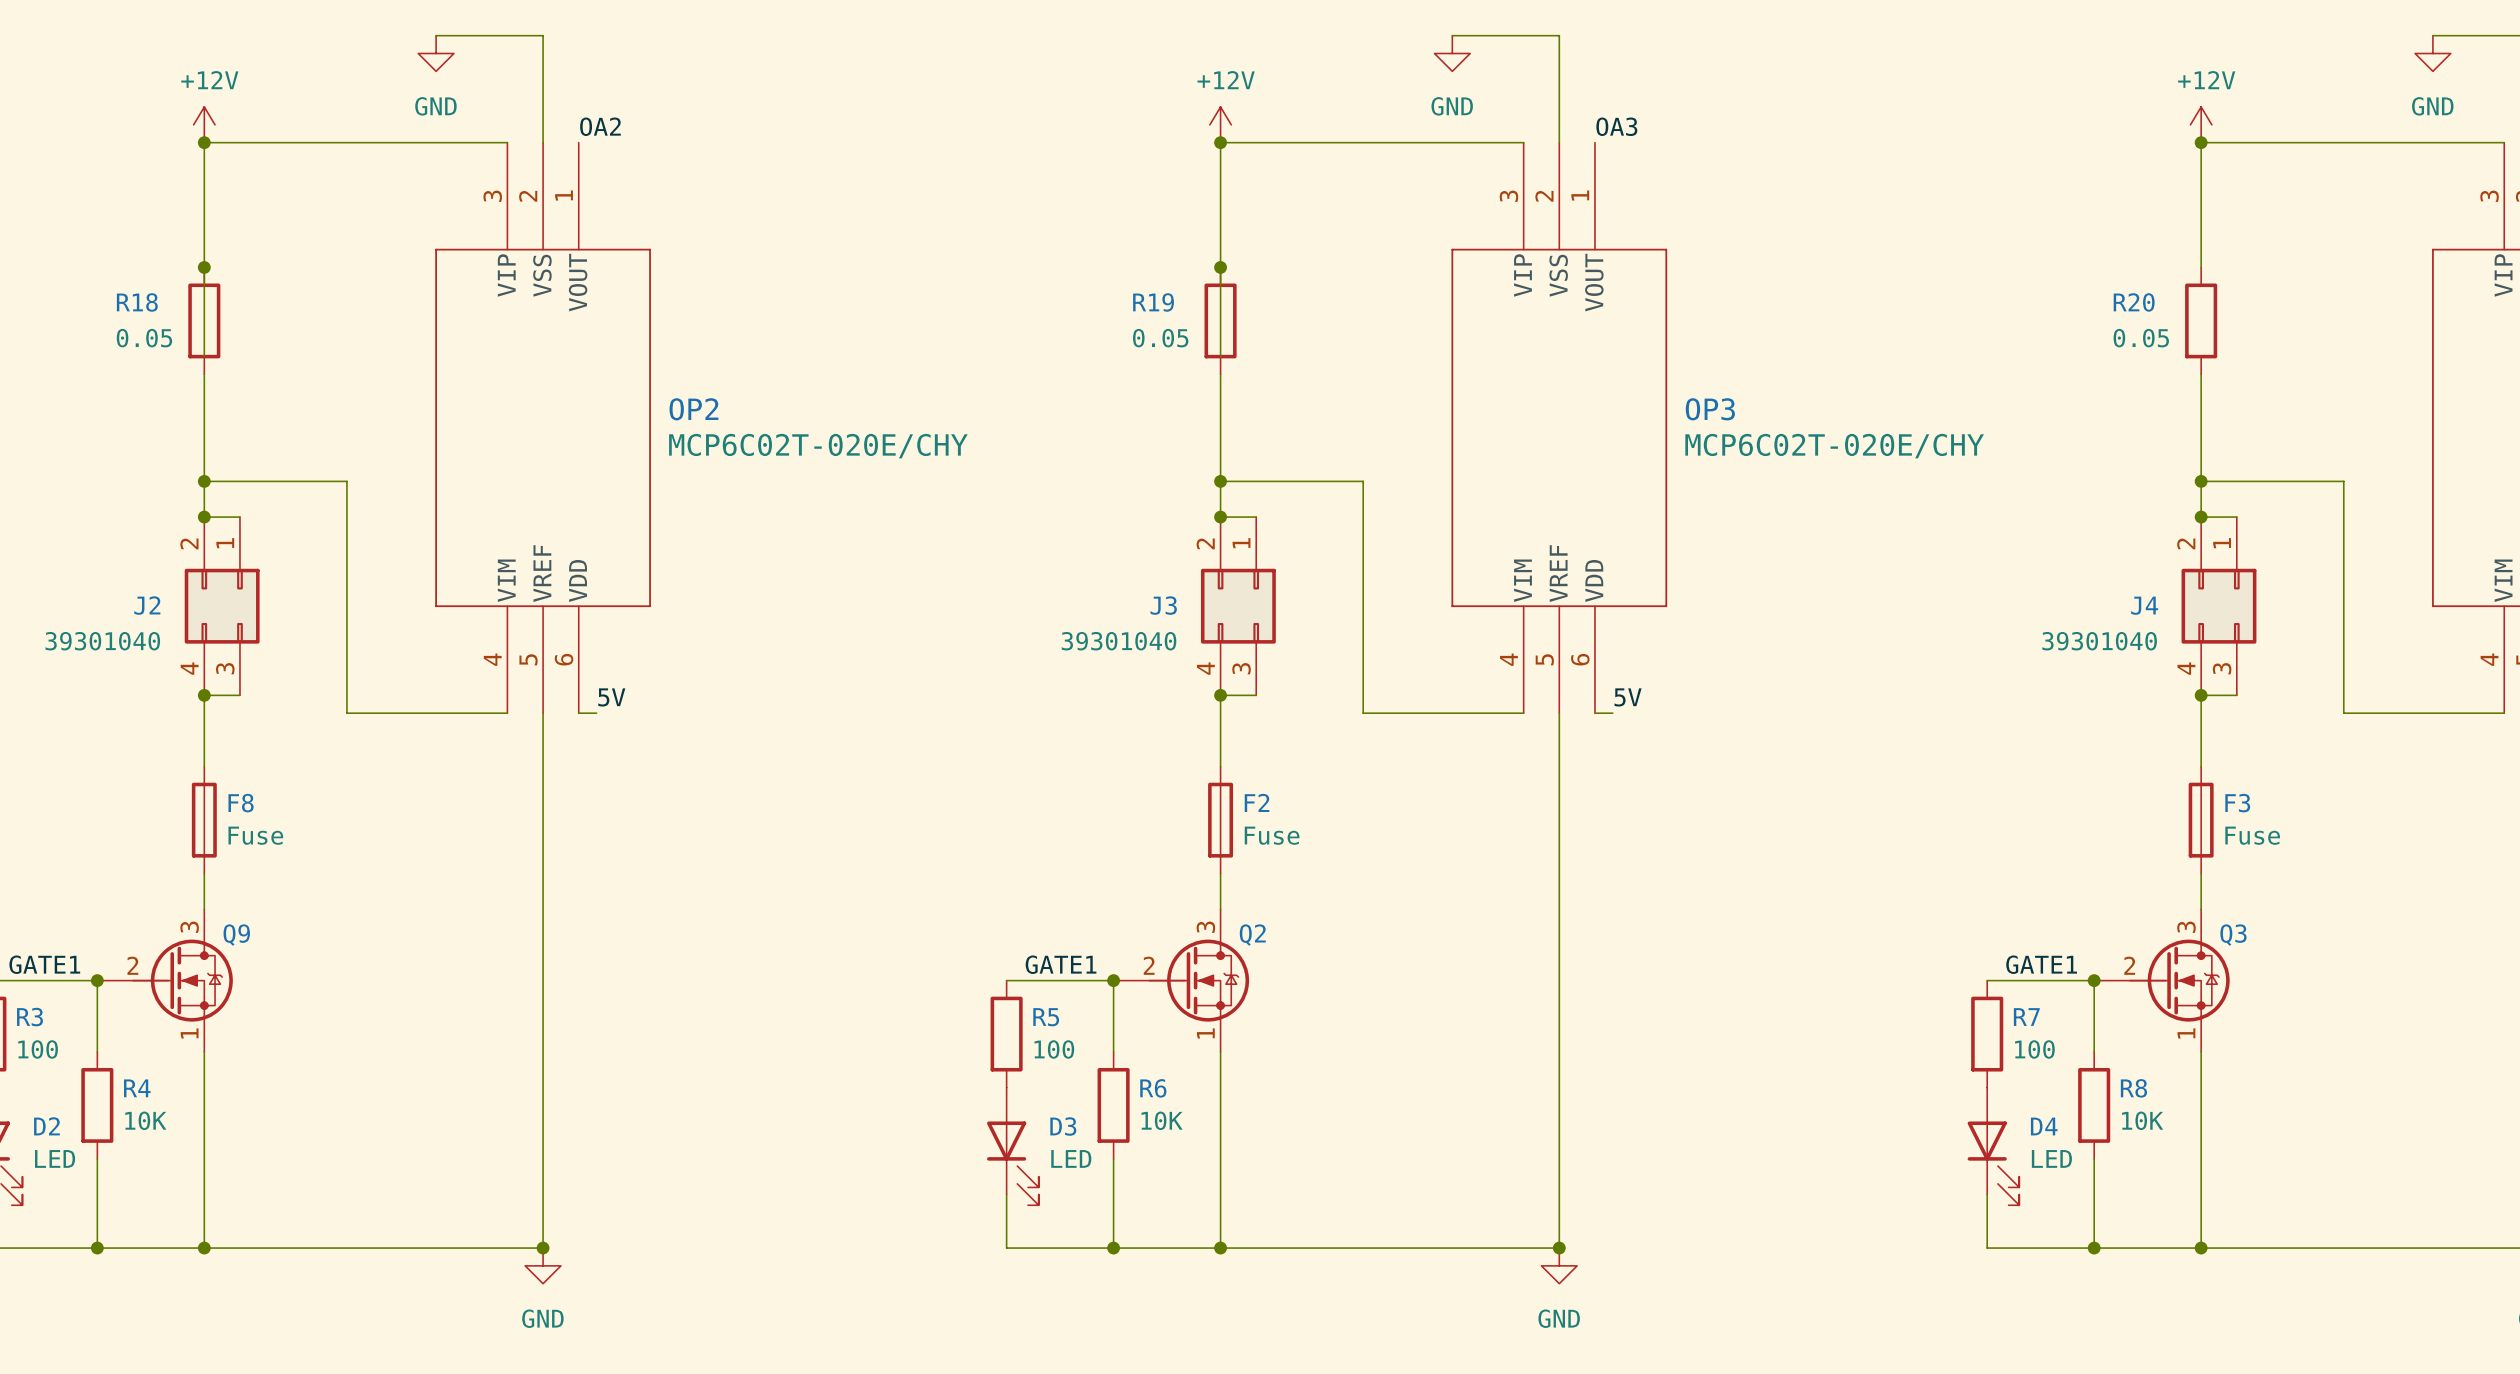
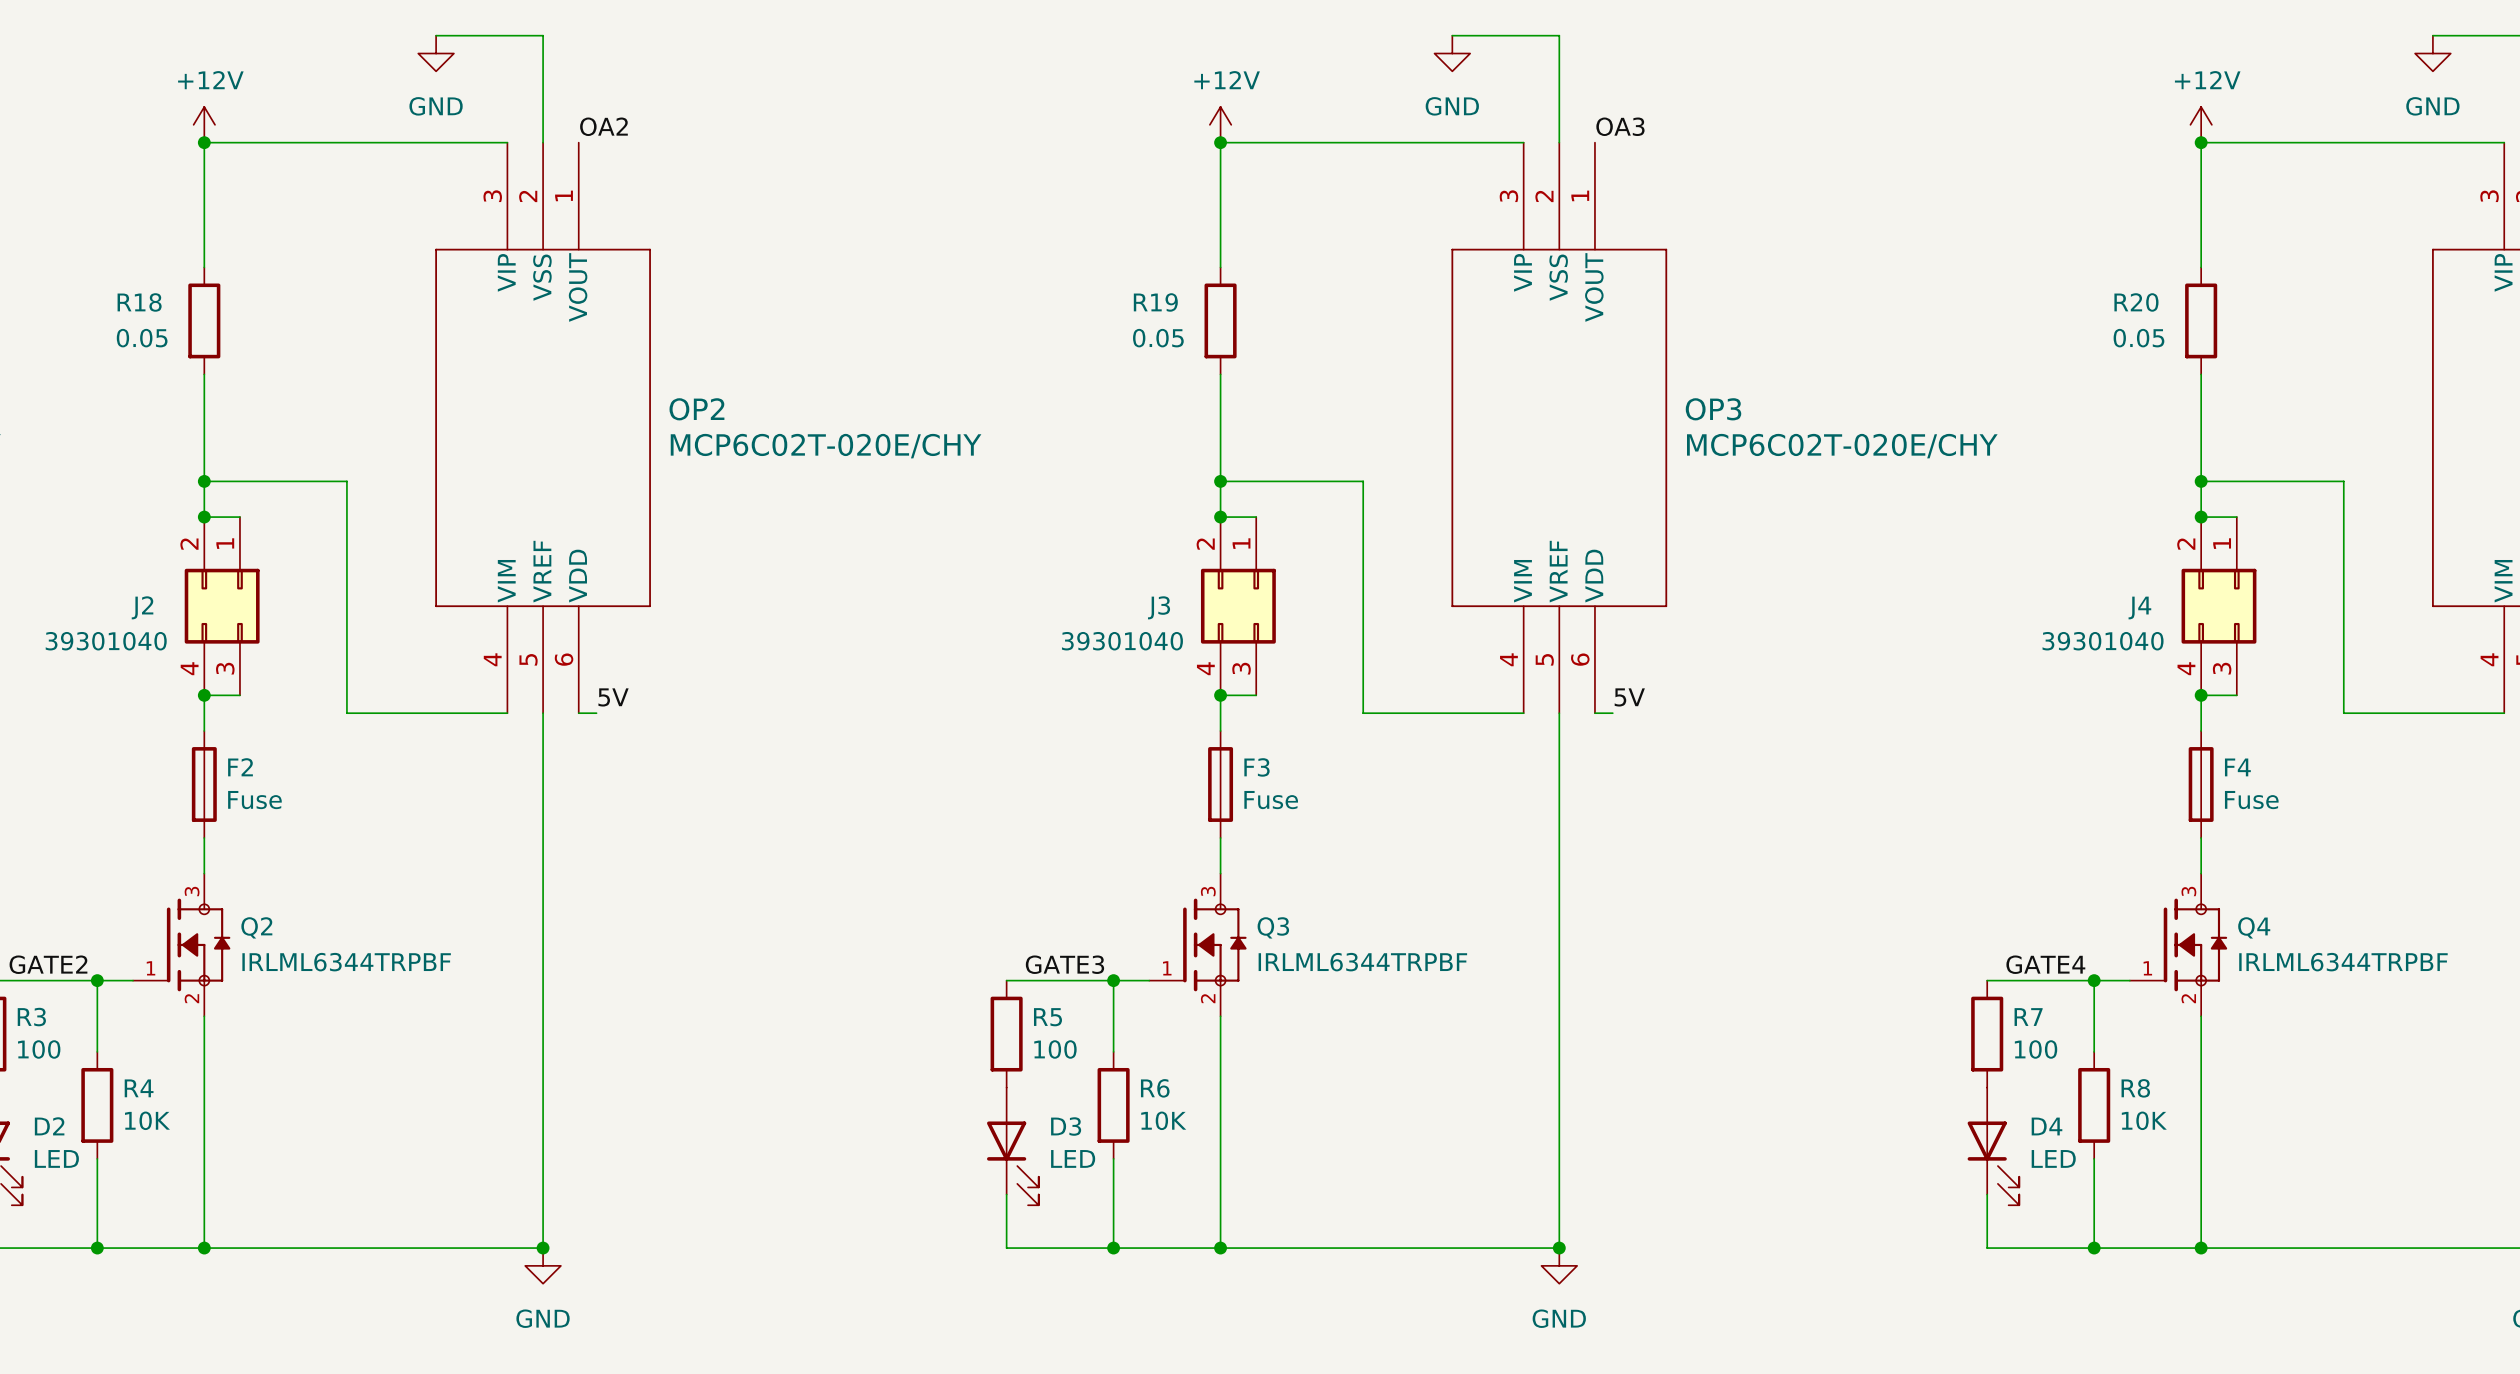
wire: (204, 267) (204, 356) -> none
junction: (204, 267) -> none
wire: (1220, 267) (1220, 356) -> none
junction: (1220, 267) -> none
F4: none -> Fuse (2201, 784)
F8: Fuse (204, 820) -> none
F2 position: (1220, 820) -> (204, 784)
F3 position: (2201, 820) -> (1220, 784)
Q2 symbol: [1113, 909, 1250, 1052] -> [133, 873, 231, 1017]
Q3 symbol: [2094, 909, 2230, 1052] -> [1149, 873, 1247, 1017]
Q2 name position: Q2 (1252, 935) -> Q2 (256, 927)
Q3 name position: Q3 (2233, 935) -> Q3 (1273, 927)
Q4: none -> IRLML6344TRPBF (2178, 944)
Q2 value: none -> IRLML6344TRPBF (346, 962)
Q3 value: none -> IRLML6344TRPBF (1362, 962)
label: GATE1 (44, 964) -> GATE2 (48, 964)
label: GATE1 (1061, 964) -> GATE3 (1064, 964)
label: GATE1 (2041, 964) -> GATE4 (2045, 964)
Q9: (165, 980) -> none

